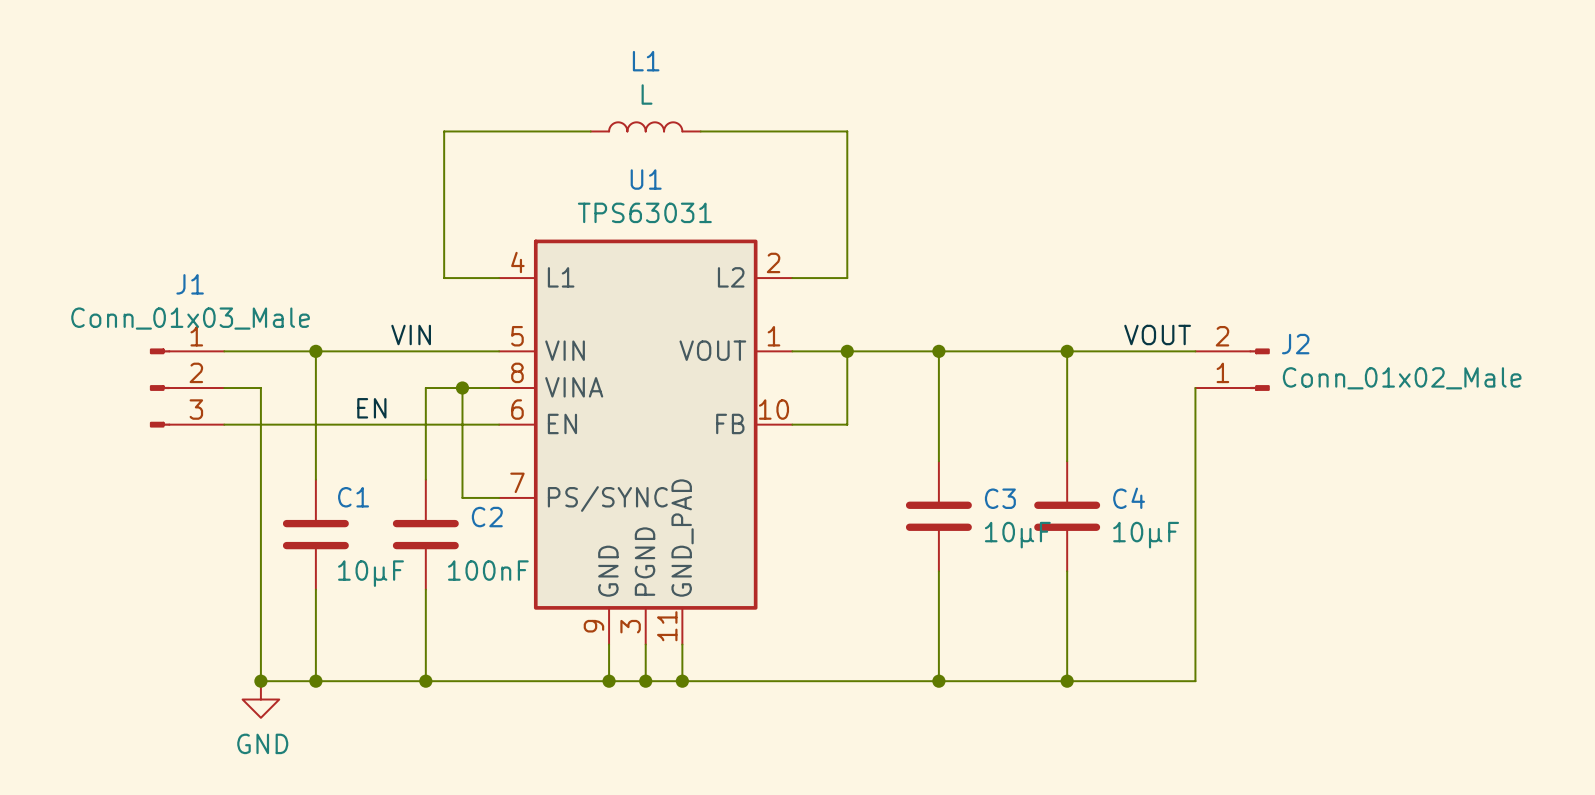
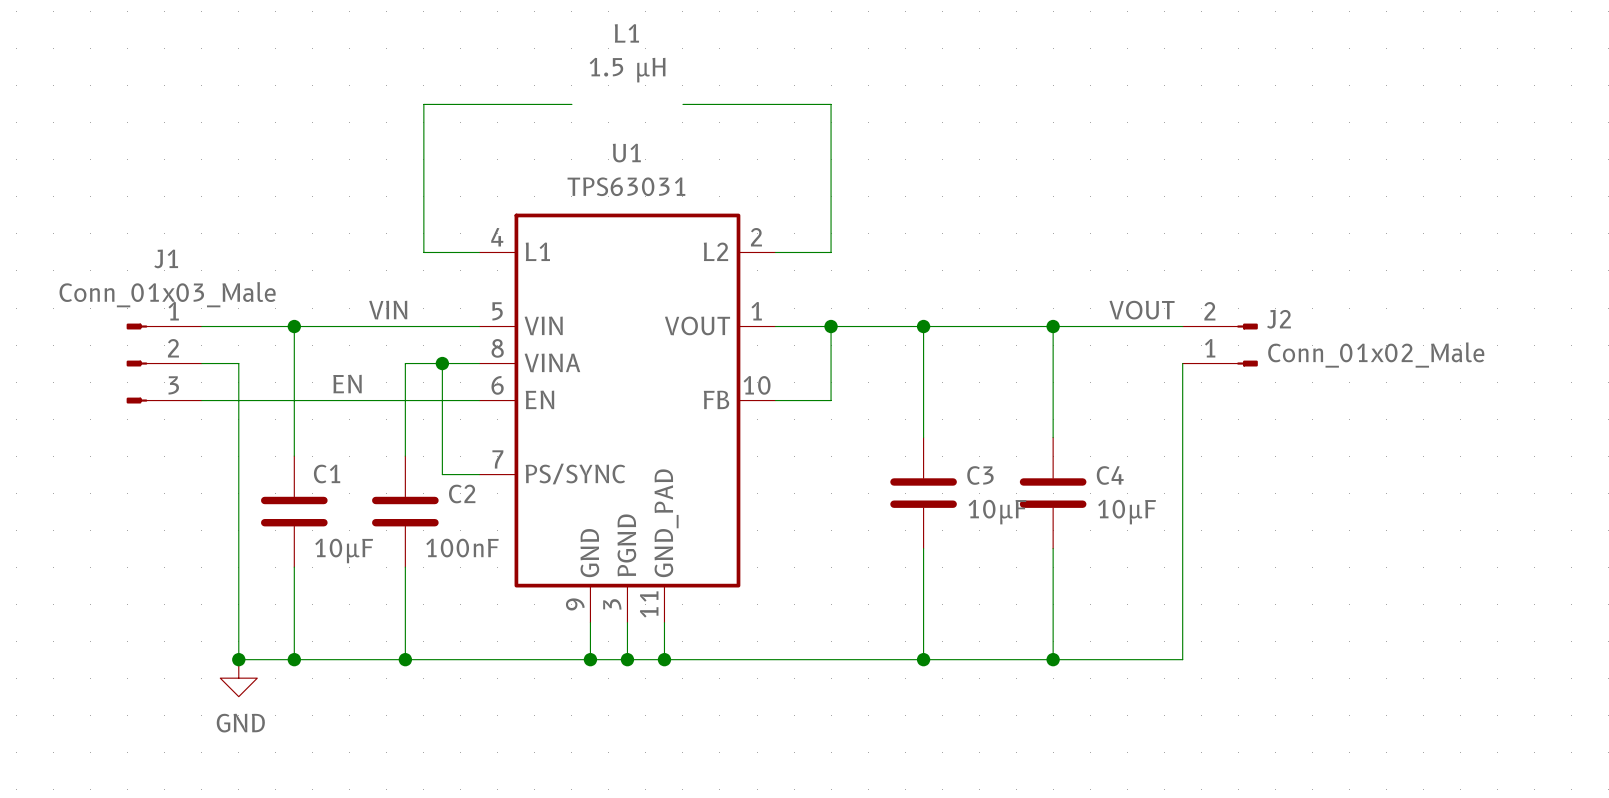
L1 value: L (647, 94) -> 1.5 µH (627, 70)
L1 symbol: [590, 122, 701, 132] -> [589, 24, 666, 83]

